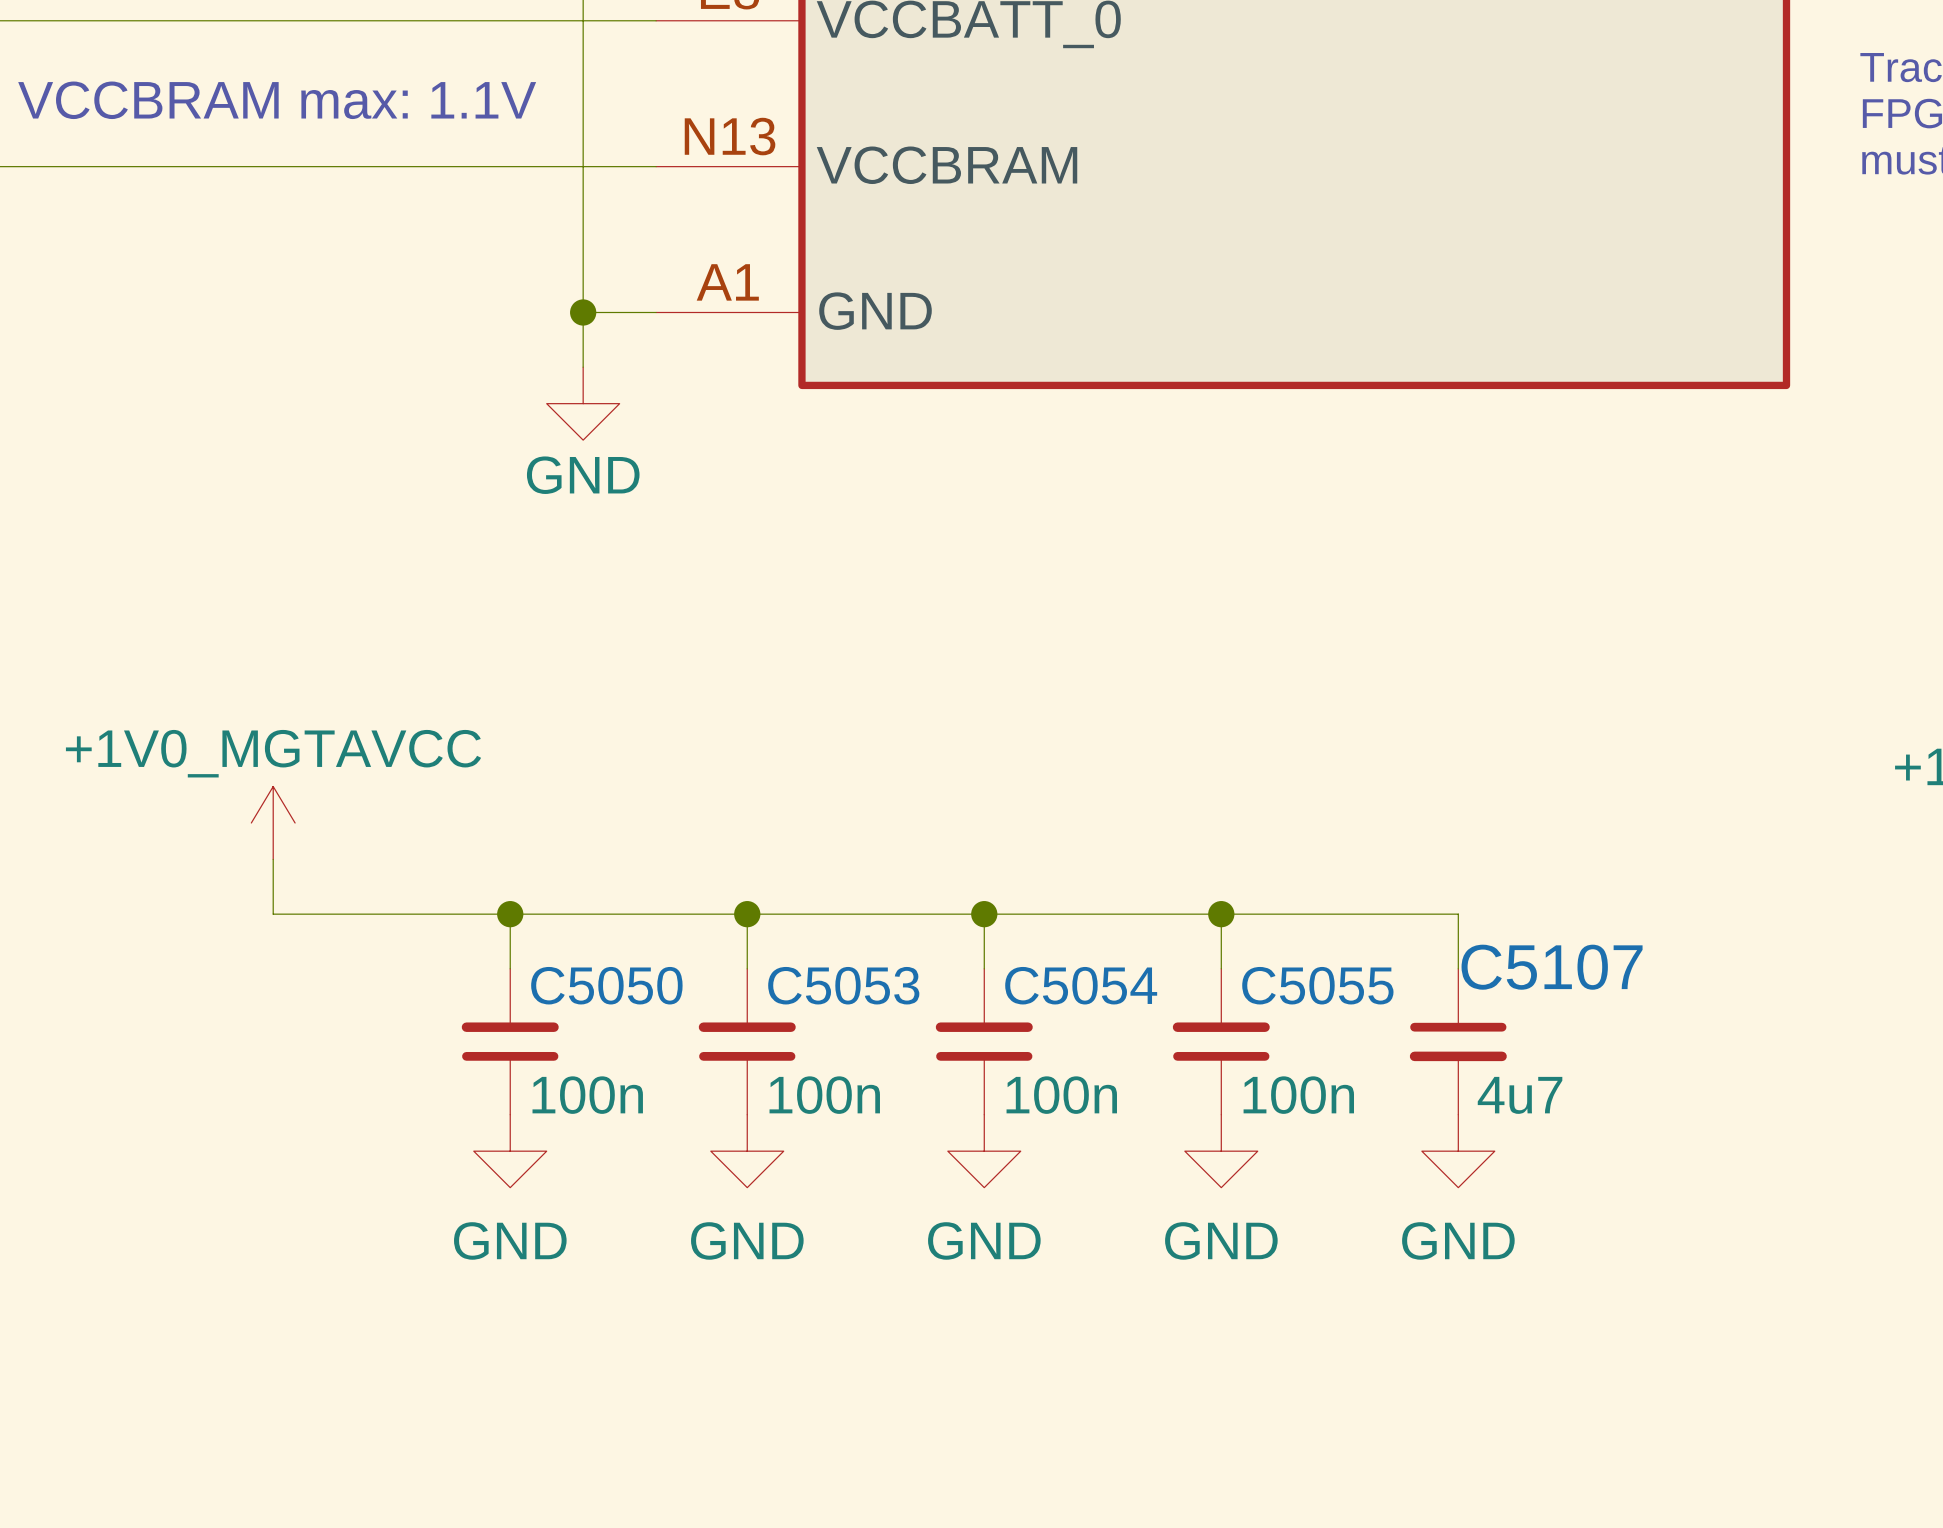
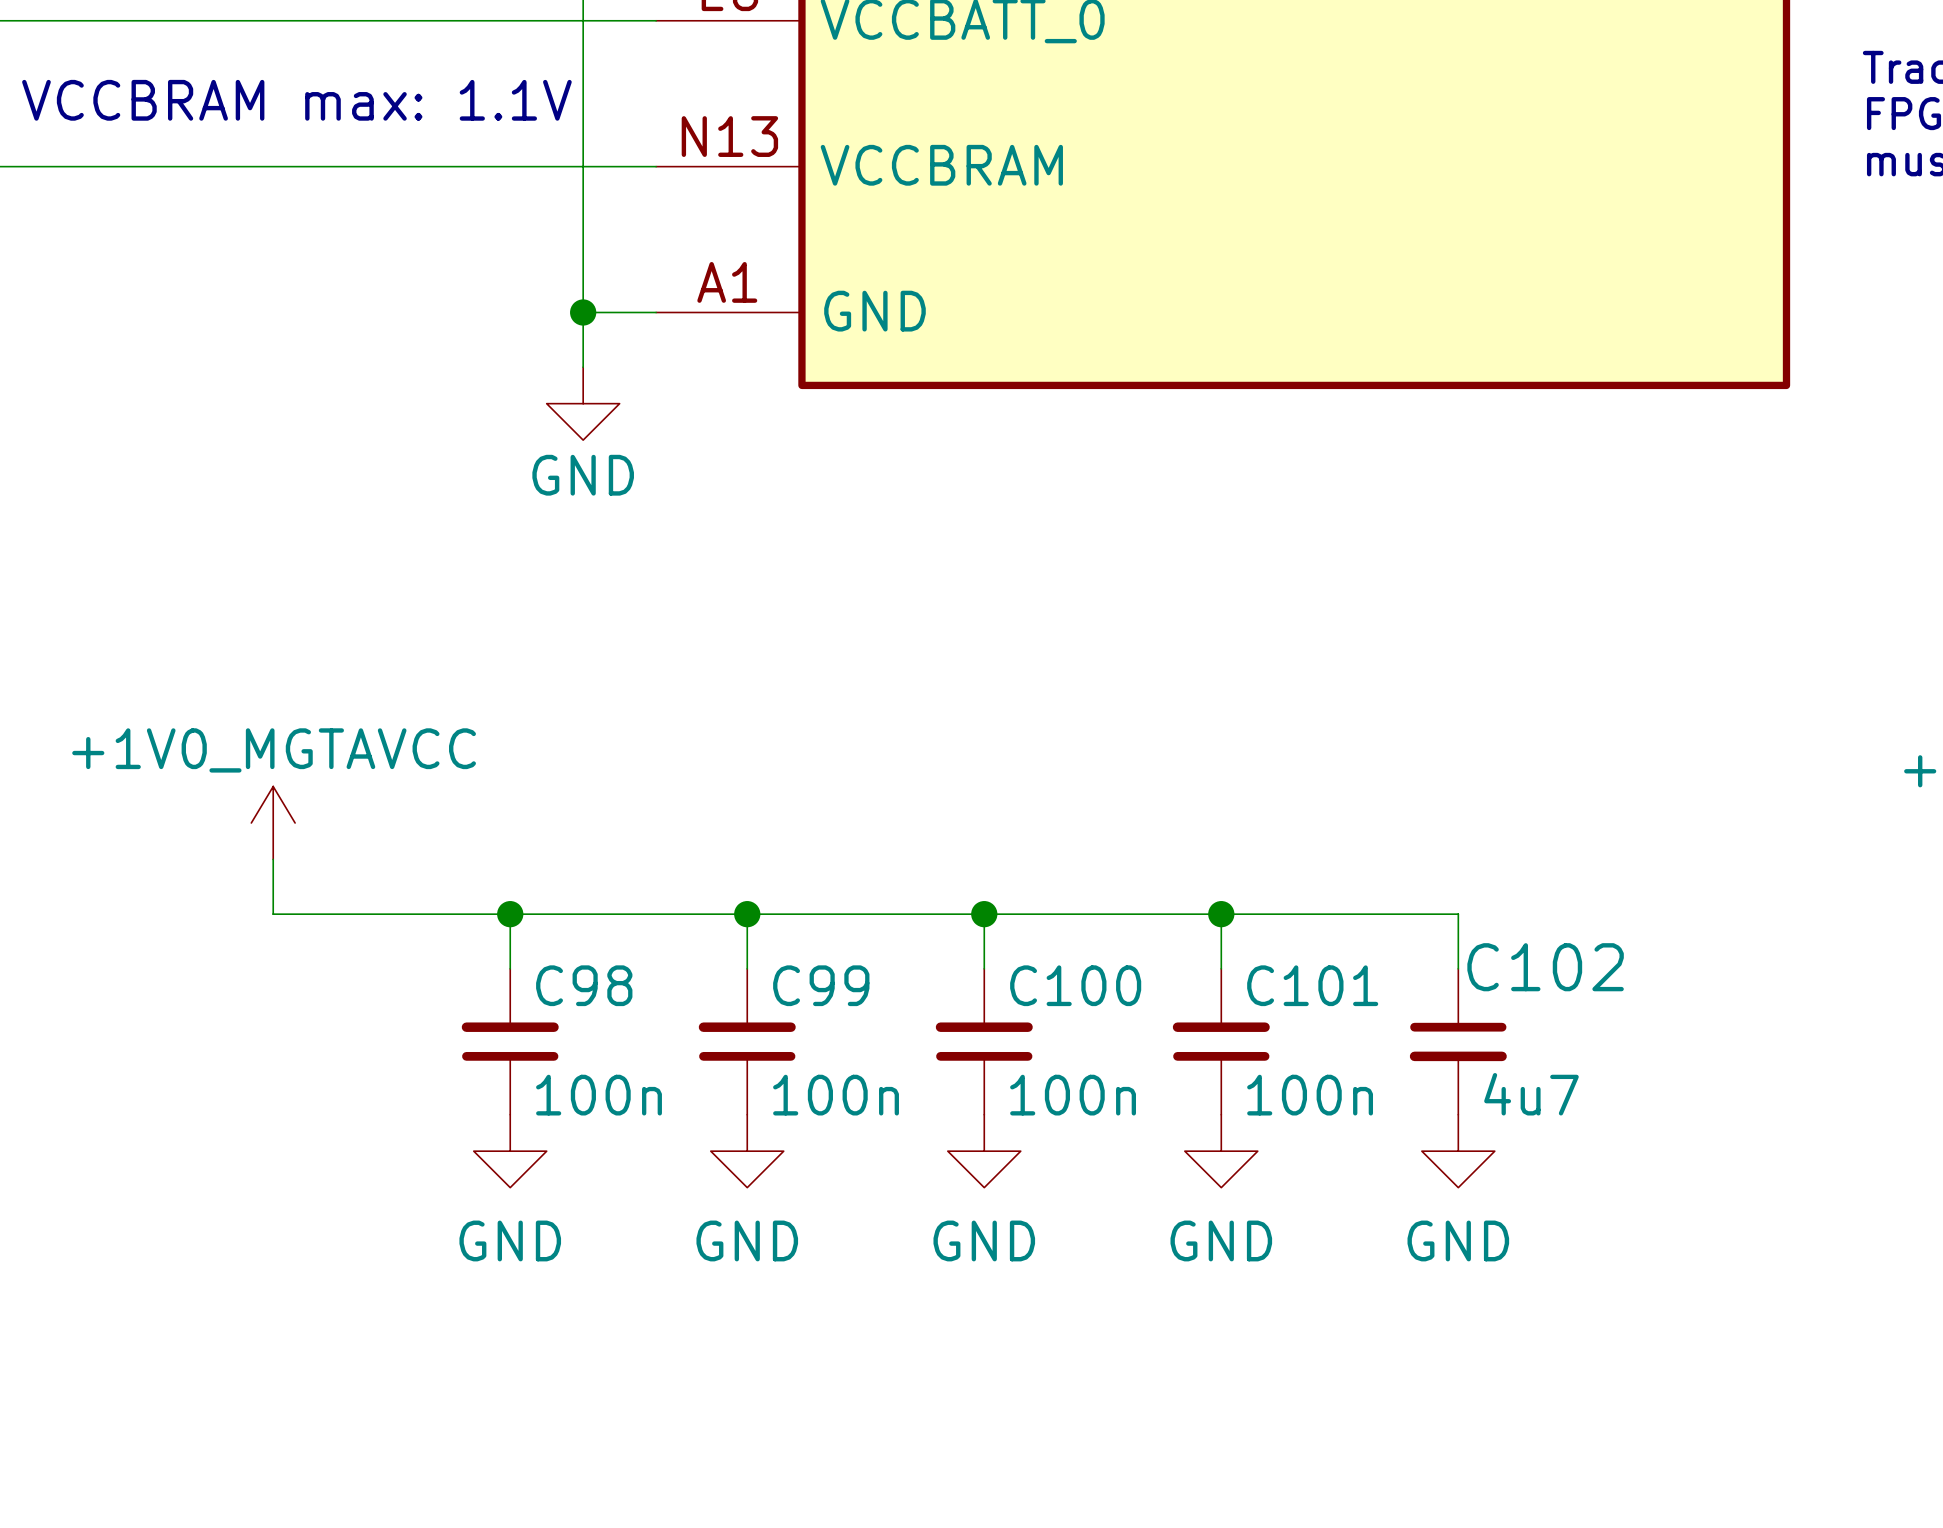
C5107 name: C5107 (1552, 967) -> C102 (1545, 967)
C5050 name: C5050 (606, 985) -> C98 (584, 985)
C5053 name: C5053 (843, 985) -> C99 (821, 985)
C5054 name: C5054 (1081, 985) -> C100 (1075, 985)
C5055 name: C5055 (1317, 985) -> C101 (1312, 985)

